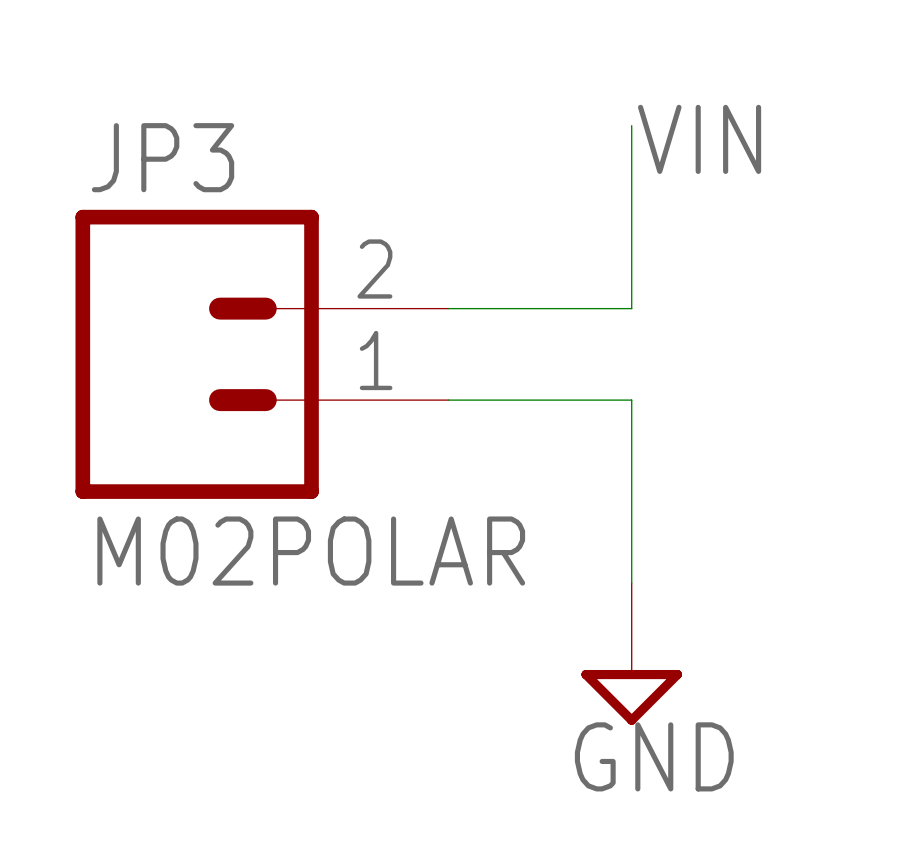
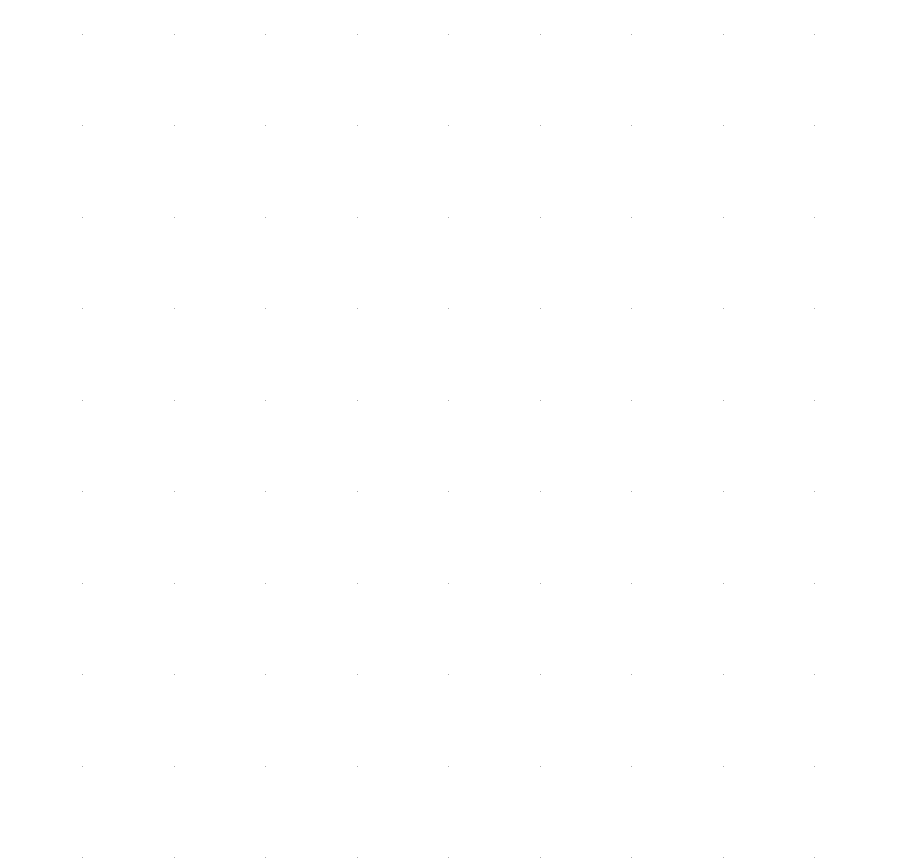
wire: (631, 125) (631, 308) (448, 308) -> none
label: VIN (699, 139) -> none
JP3: M02POLAR (262, 354) -> none
wire: (448, 400) (631, 400) (631, 583) -> none
power symbol: GND (631, 653) -> none

